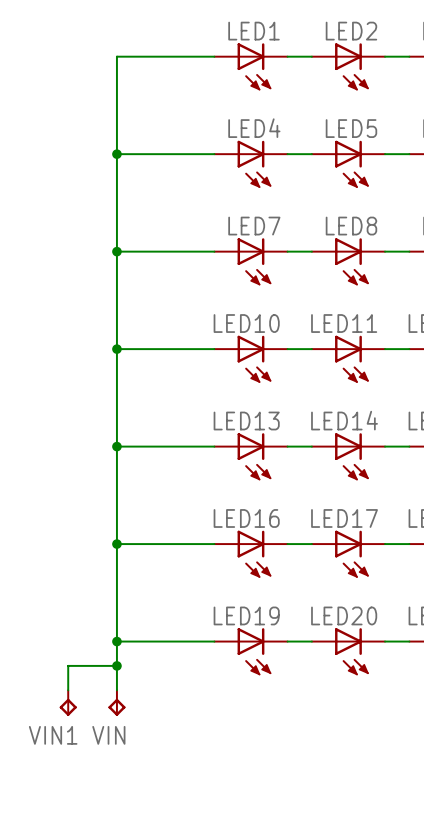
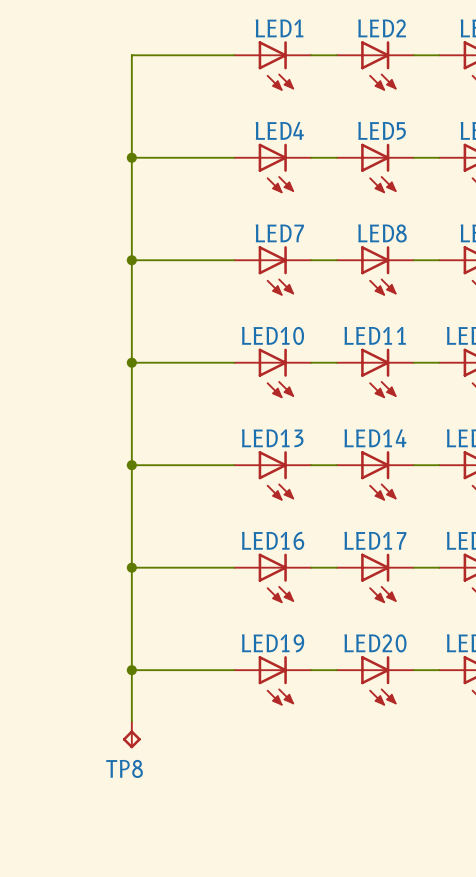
wire: (116, 665) (68, 665) (68, 690) -> none
junction: (116, 665) -> none
VIN1: (68, 703) -> none
VIN name: VIN (108, 735) -> TP8 (124, 768)

